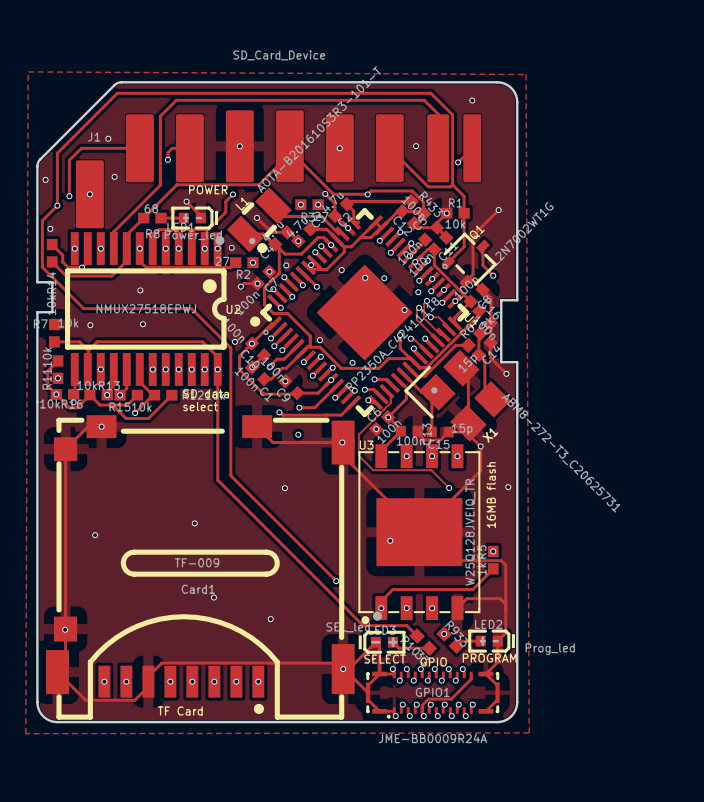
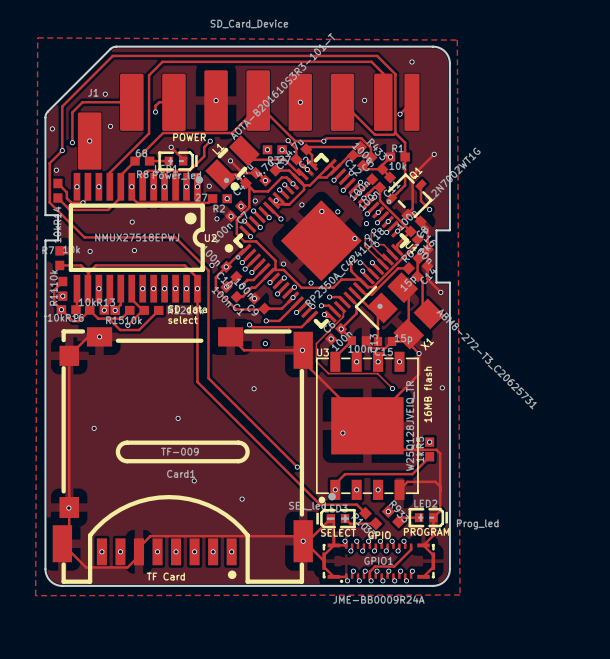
track: (257, 283) (243, 283) (240, 286) -> none

